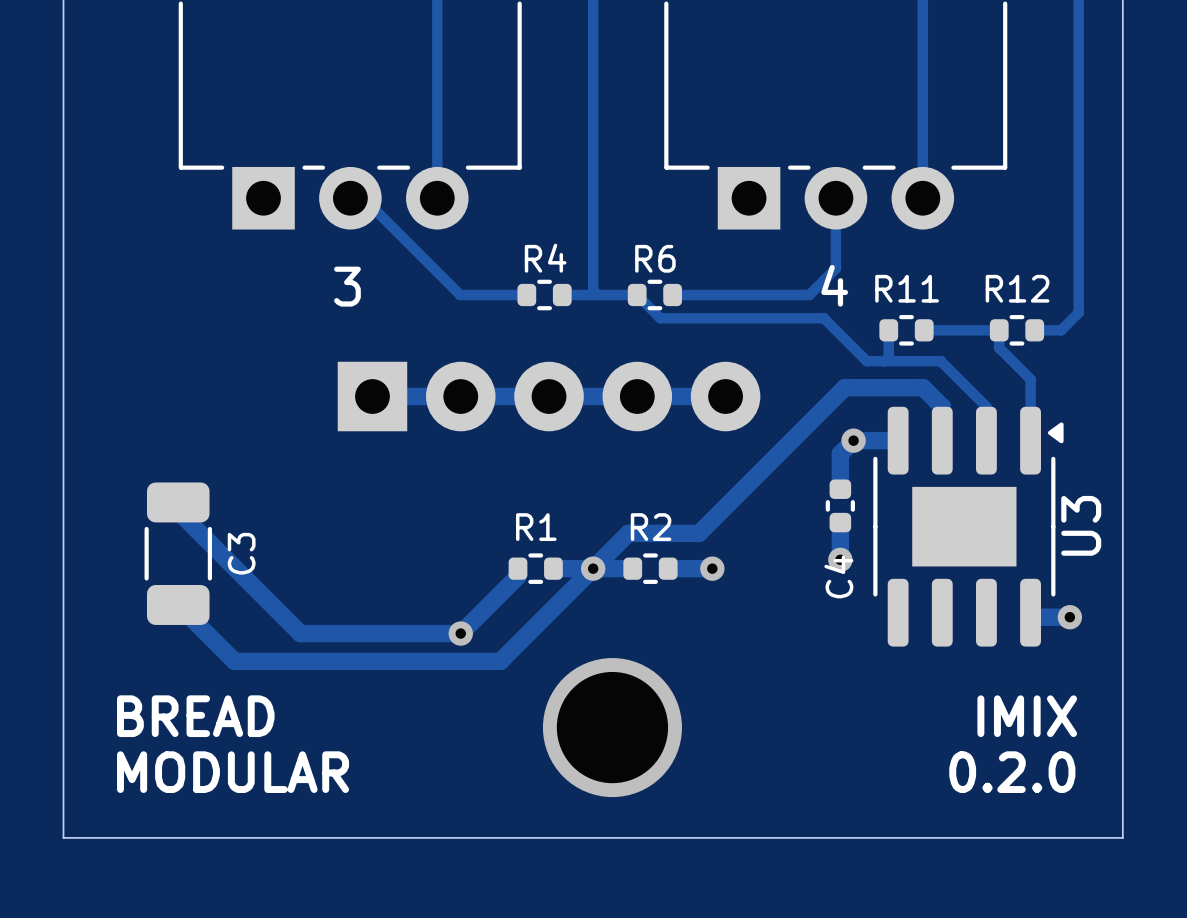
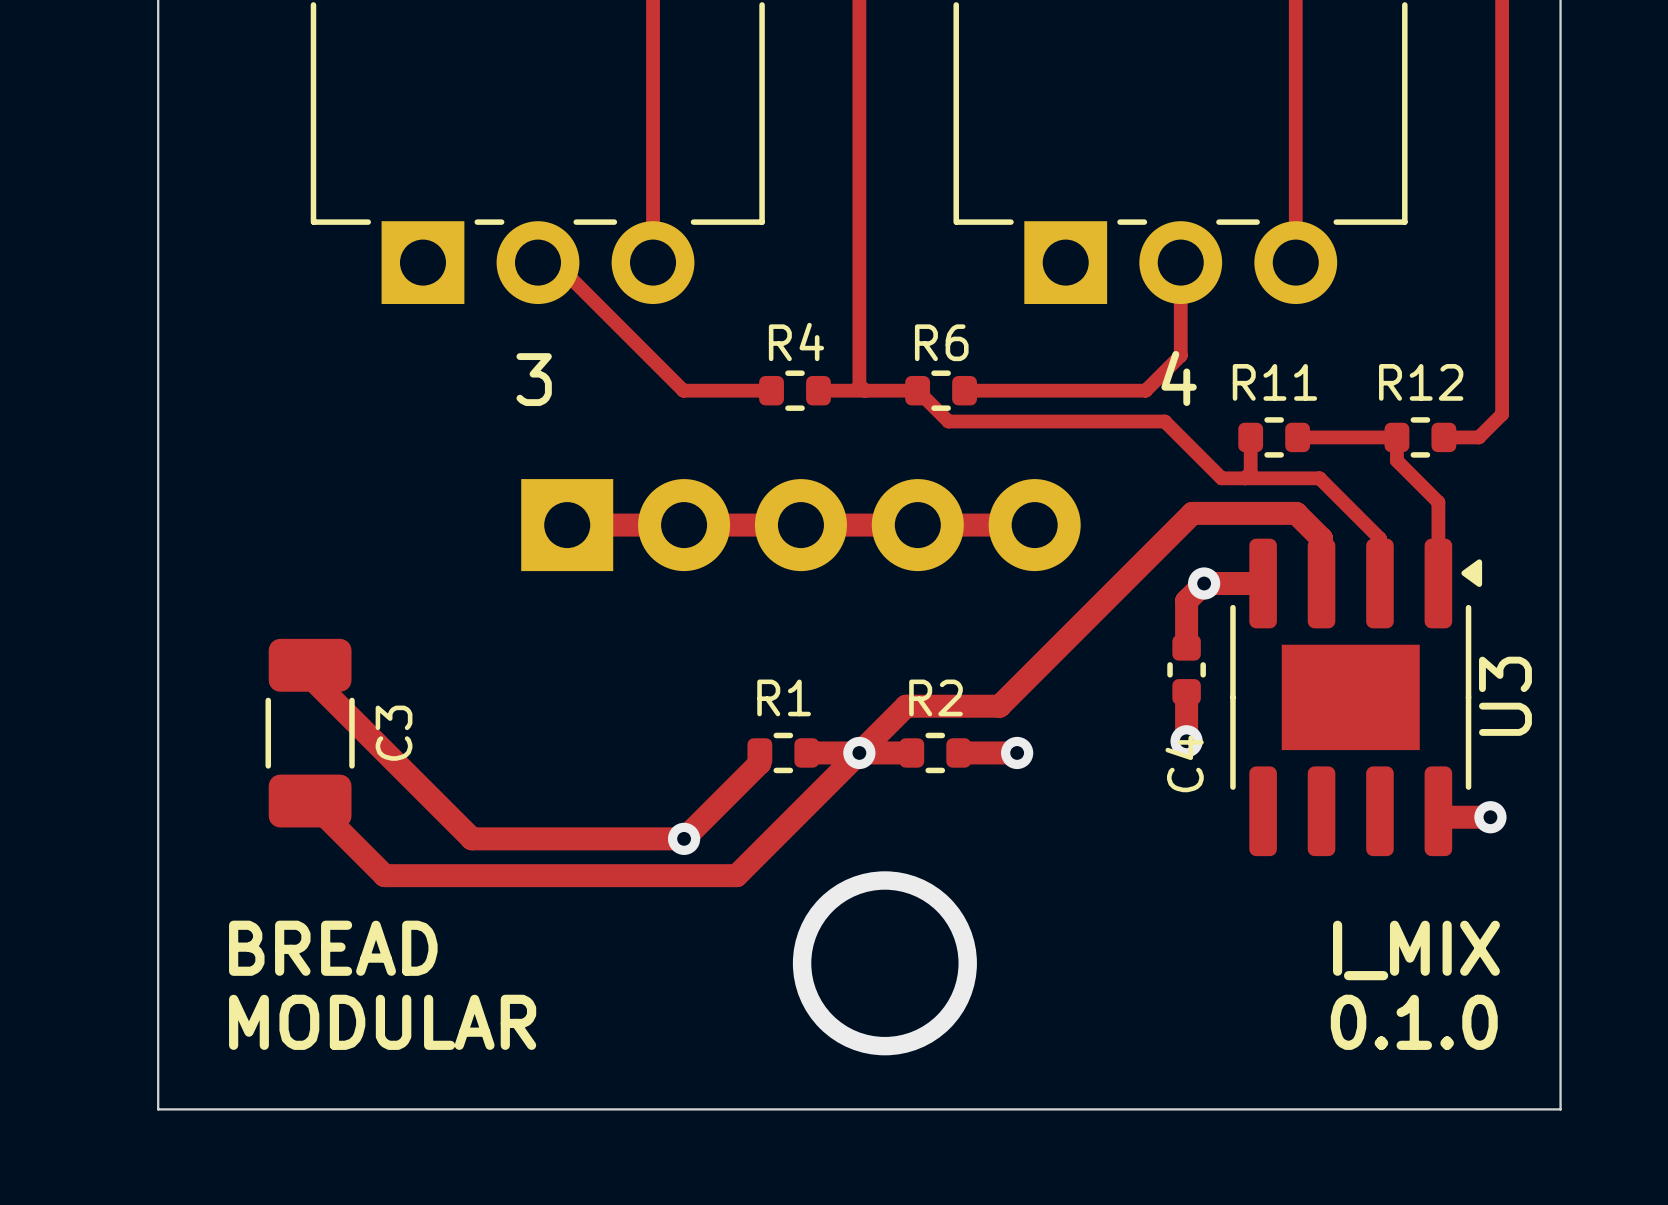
text: IMIX (1027, 716) -> I_MIX (1416, 950)
text: 0.2.0 (1012, 772) -> 0.1.0 (1414, 1022)

